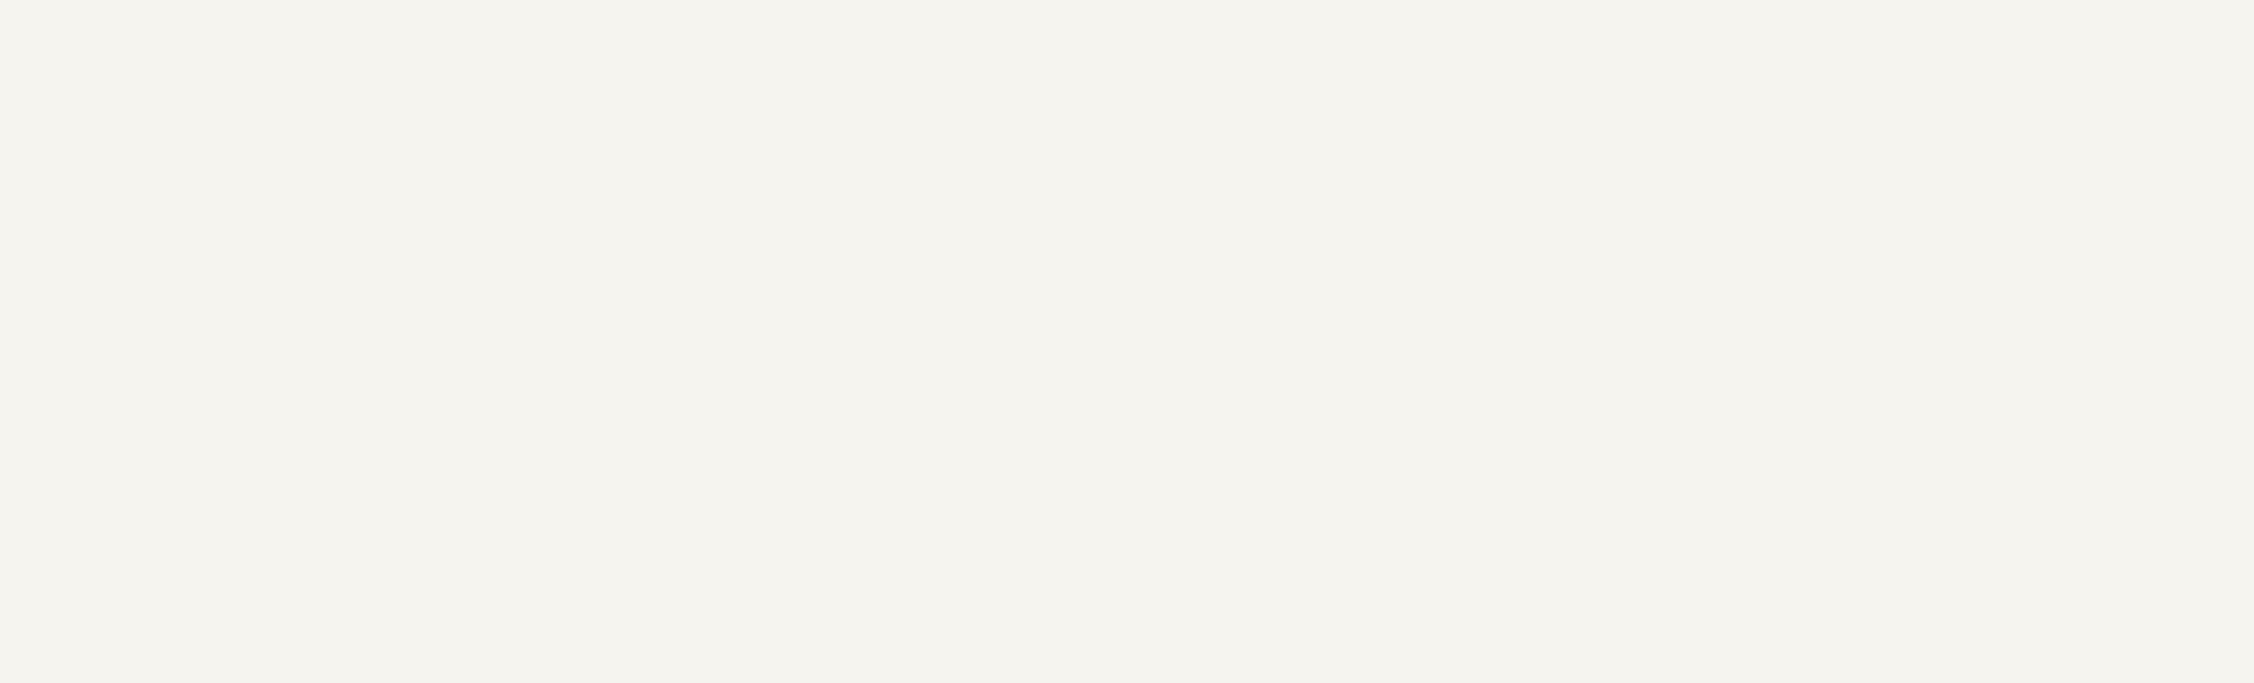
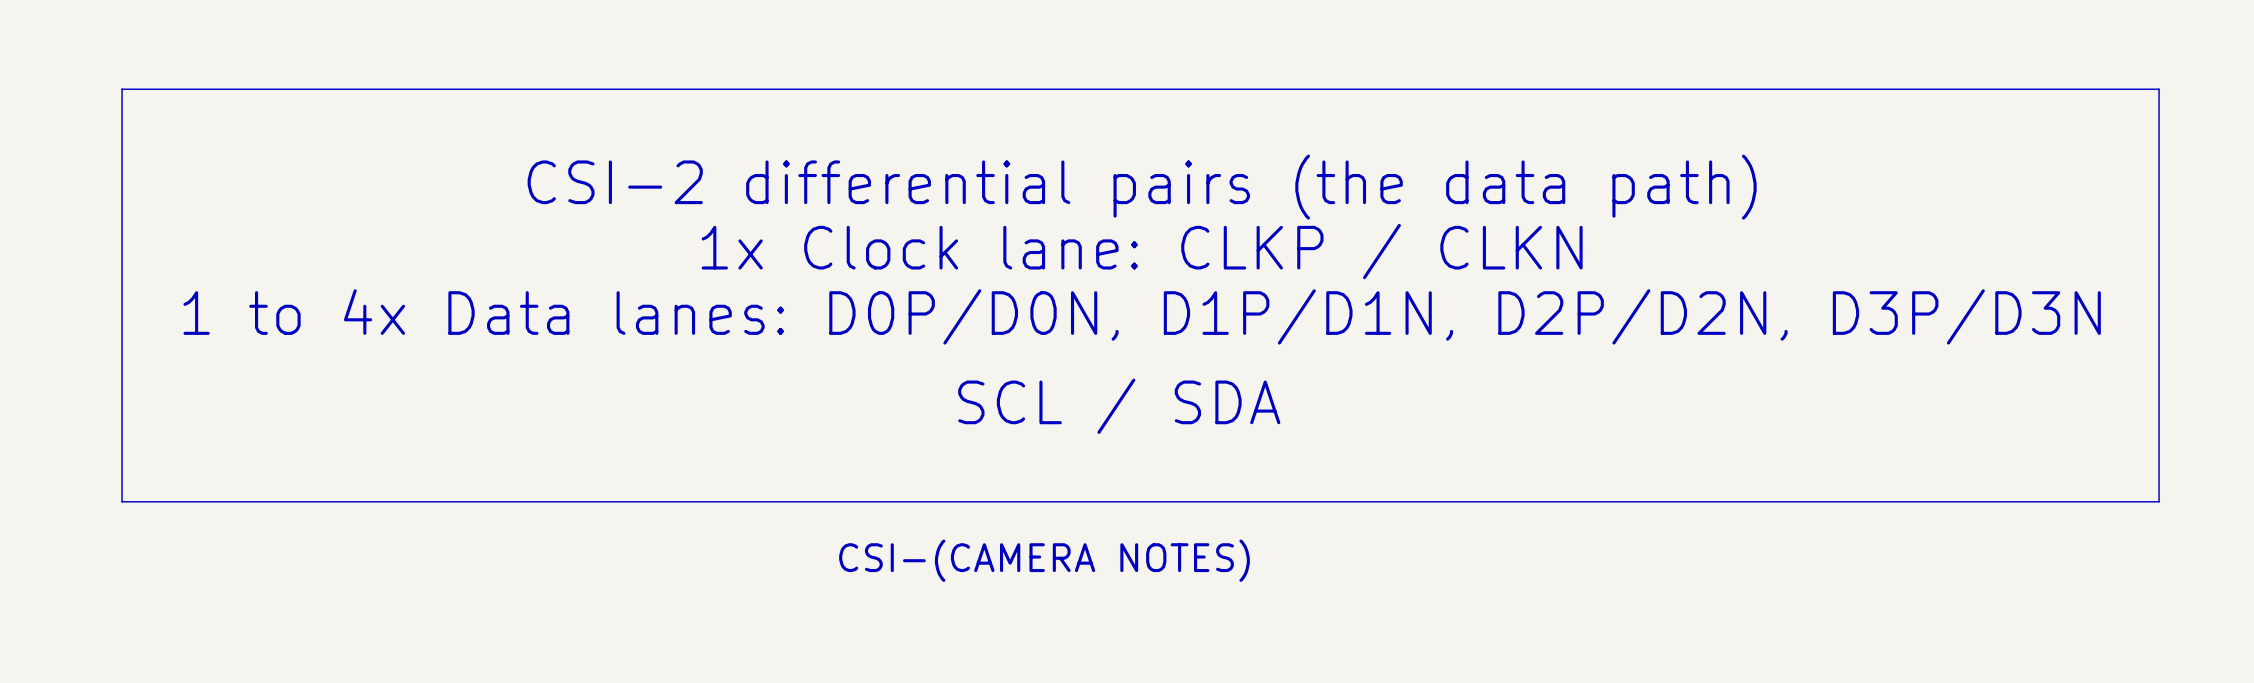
line: none -> (122, 89) (2159, 89) (2159, 501) (122, 501) (122, 89)
text: none -> CSI-2 differential pairs (the data path) (1142, 187)
text: none -> 1x Clock lane: CLKP / CLKN (1142, 251)
text: none -> 1 to 4x Data lanes: D0P/D0N, D1P/D1N, D2P/D2N, D3P/D3N (1142, 316)
text: none -> SCL / SDA (1119, 406)
text: none -> CSI-(CAMERA NOTES) (1044, 560)

